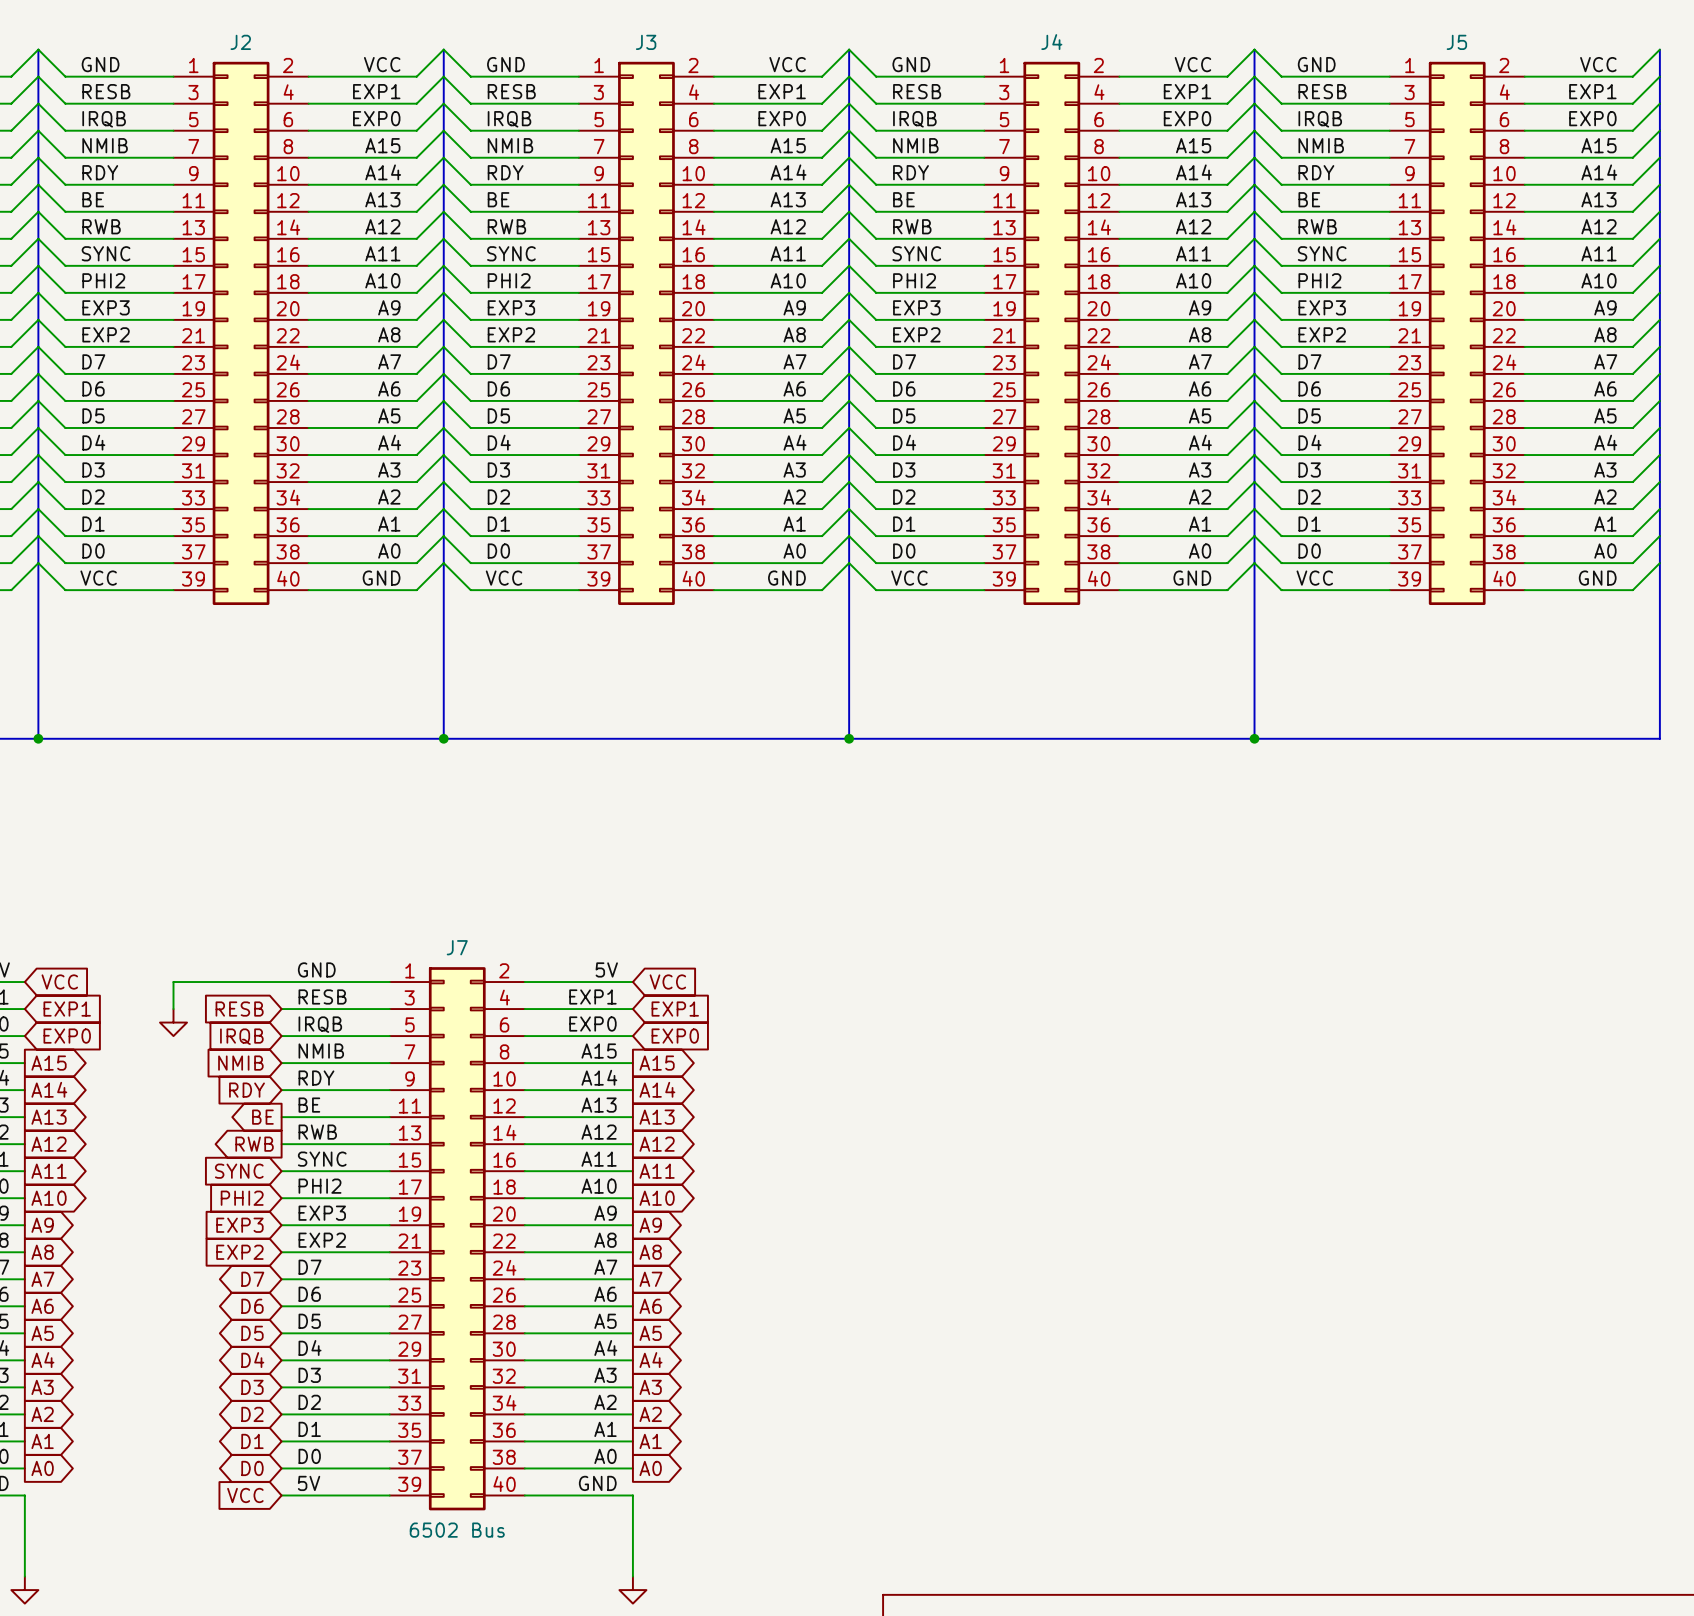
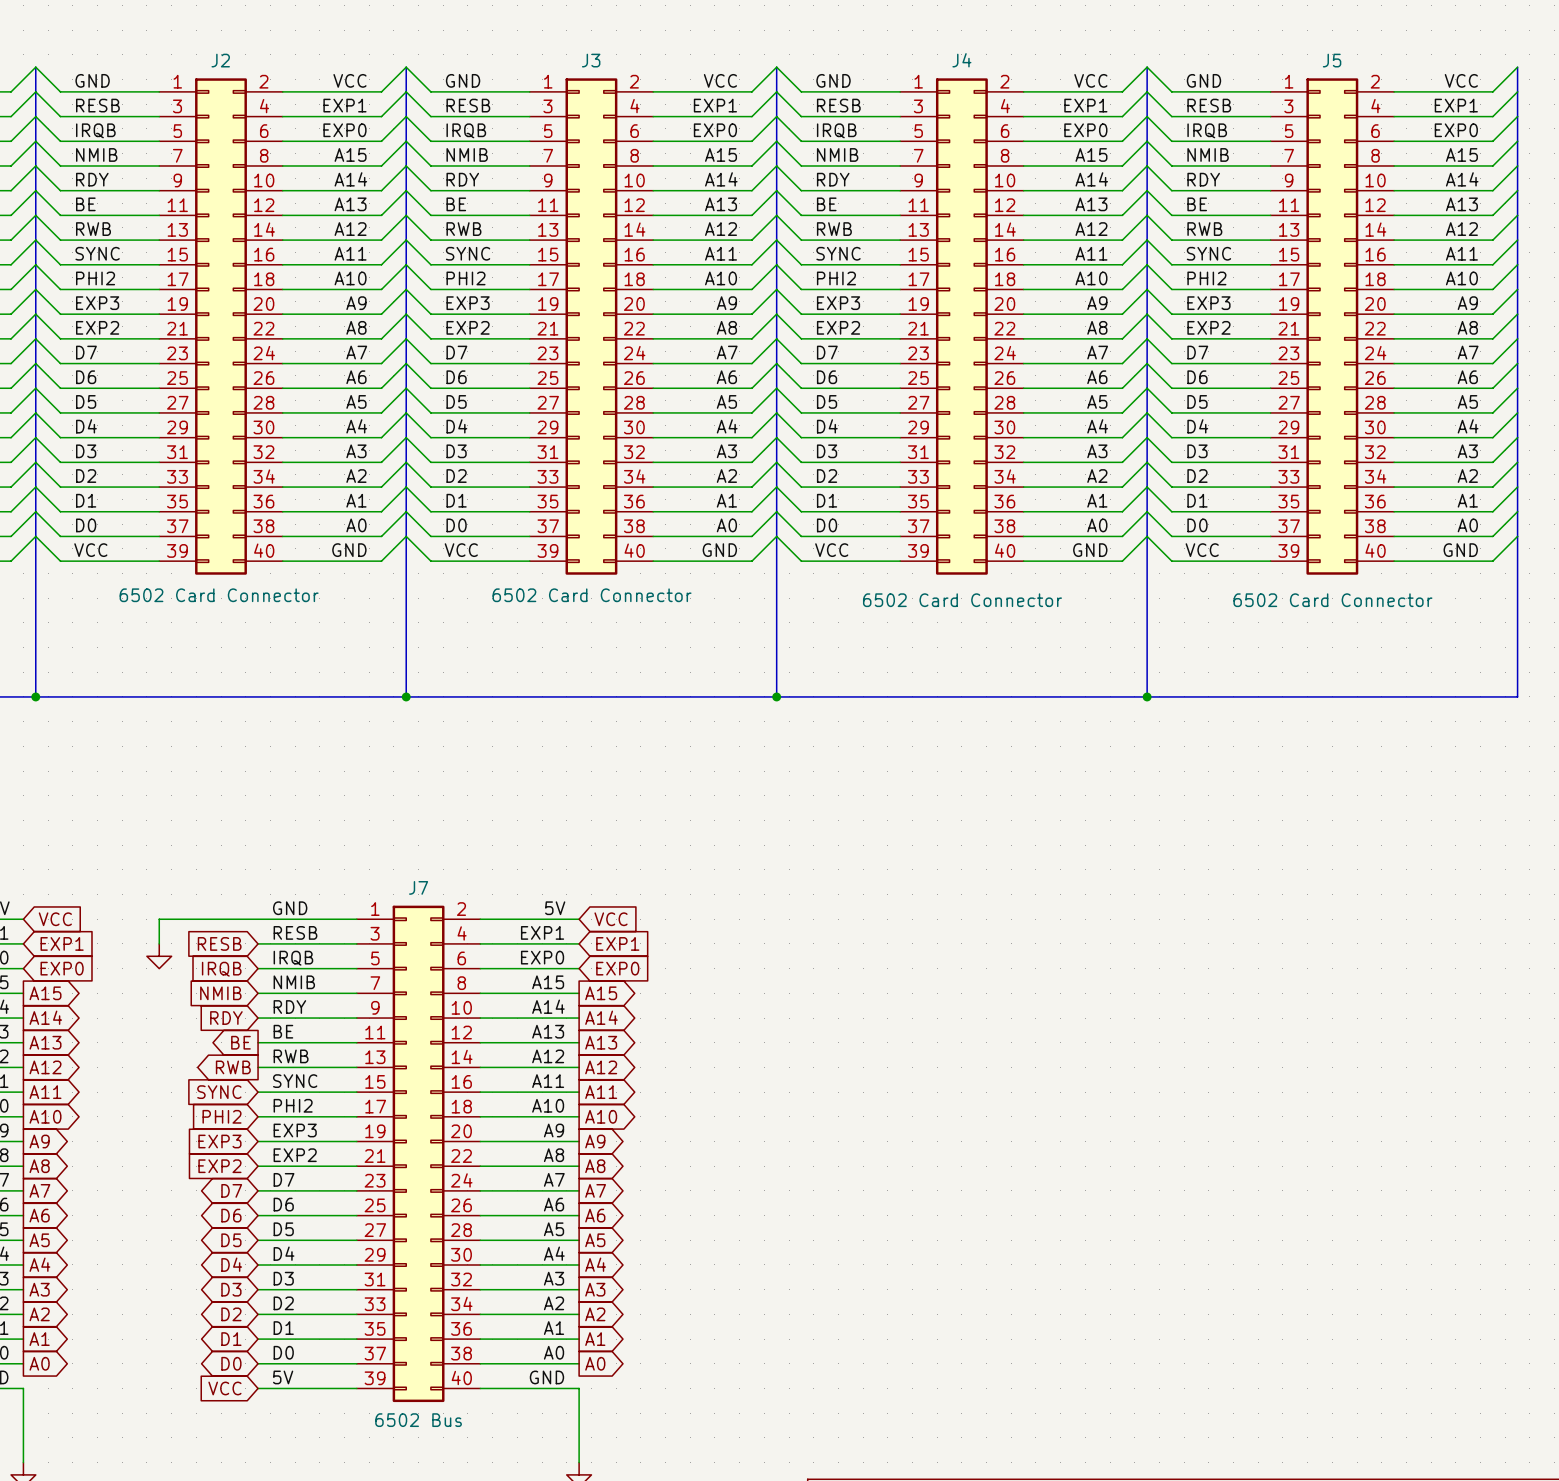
J2 value: none -> 6502 Card Connector (219, 595)
J3 value: none -> 6502 Card Connector (592, 595)
J4 value: none -> 6502 Card Connector (962, 600)
J5 value: none -> 6502 Card Connector (1332, 600)

